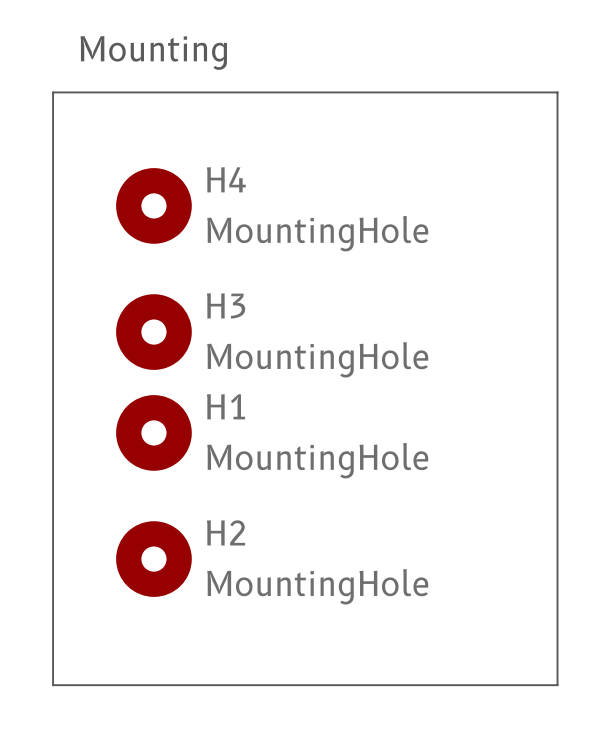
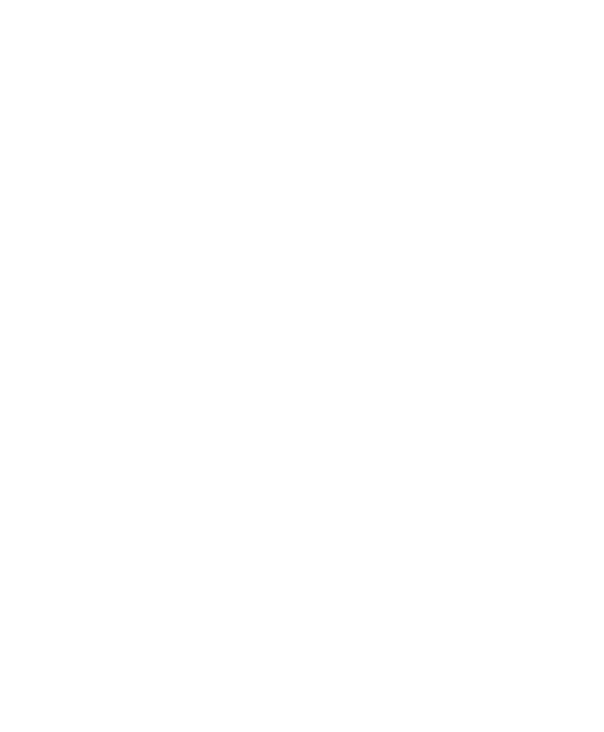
text: Mounting (153, 52) -> none
line: (53, 92) (557, 92) (557, 685) (53, 685) (53, 92) -> none
H4: MountingHole (153, 205) -> none
H3: MountingHole (153, 332) -> none
H1: MountingHole (153, 432) -> none
H2: MountingHole (153, 559) -> none

